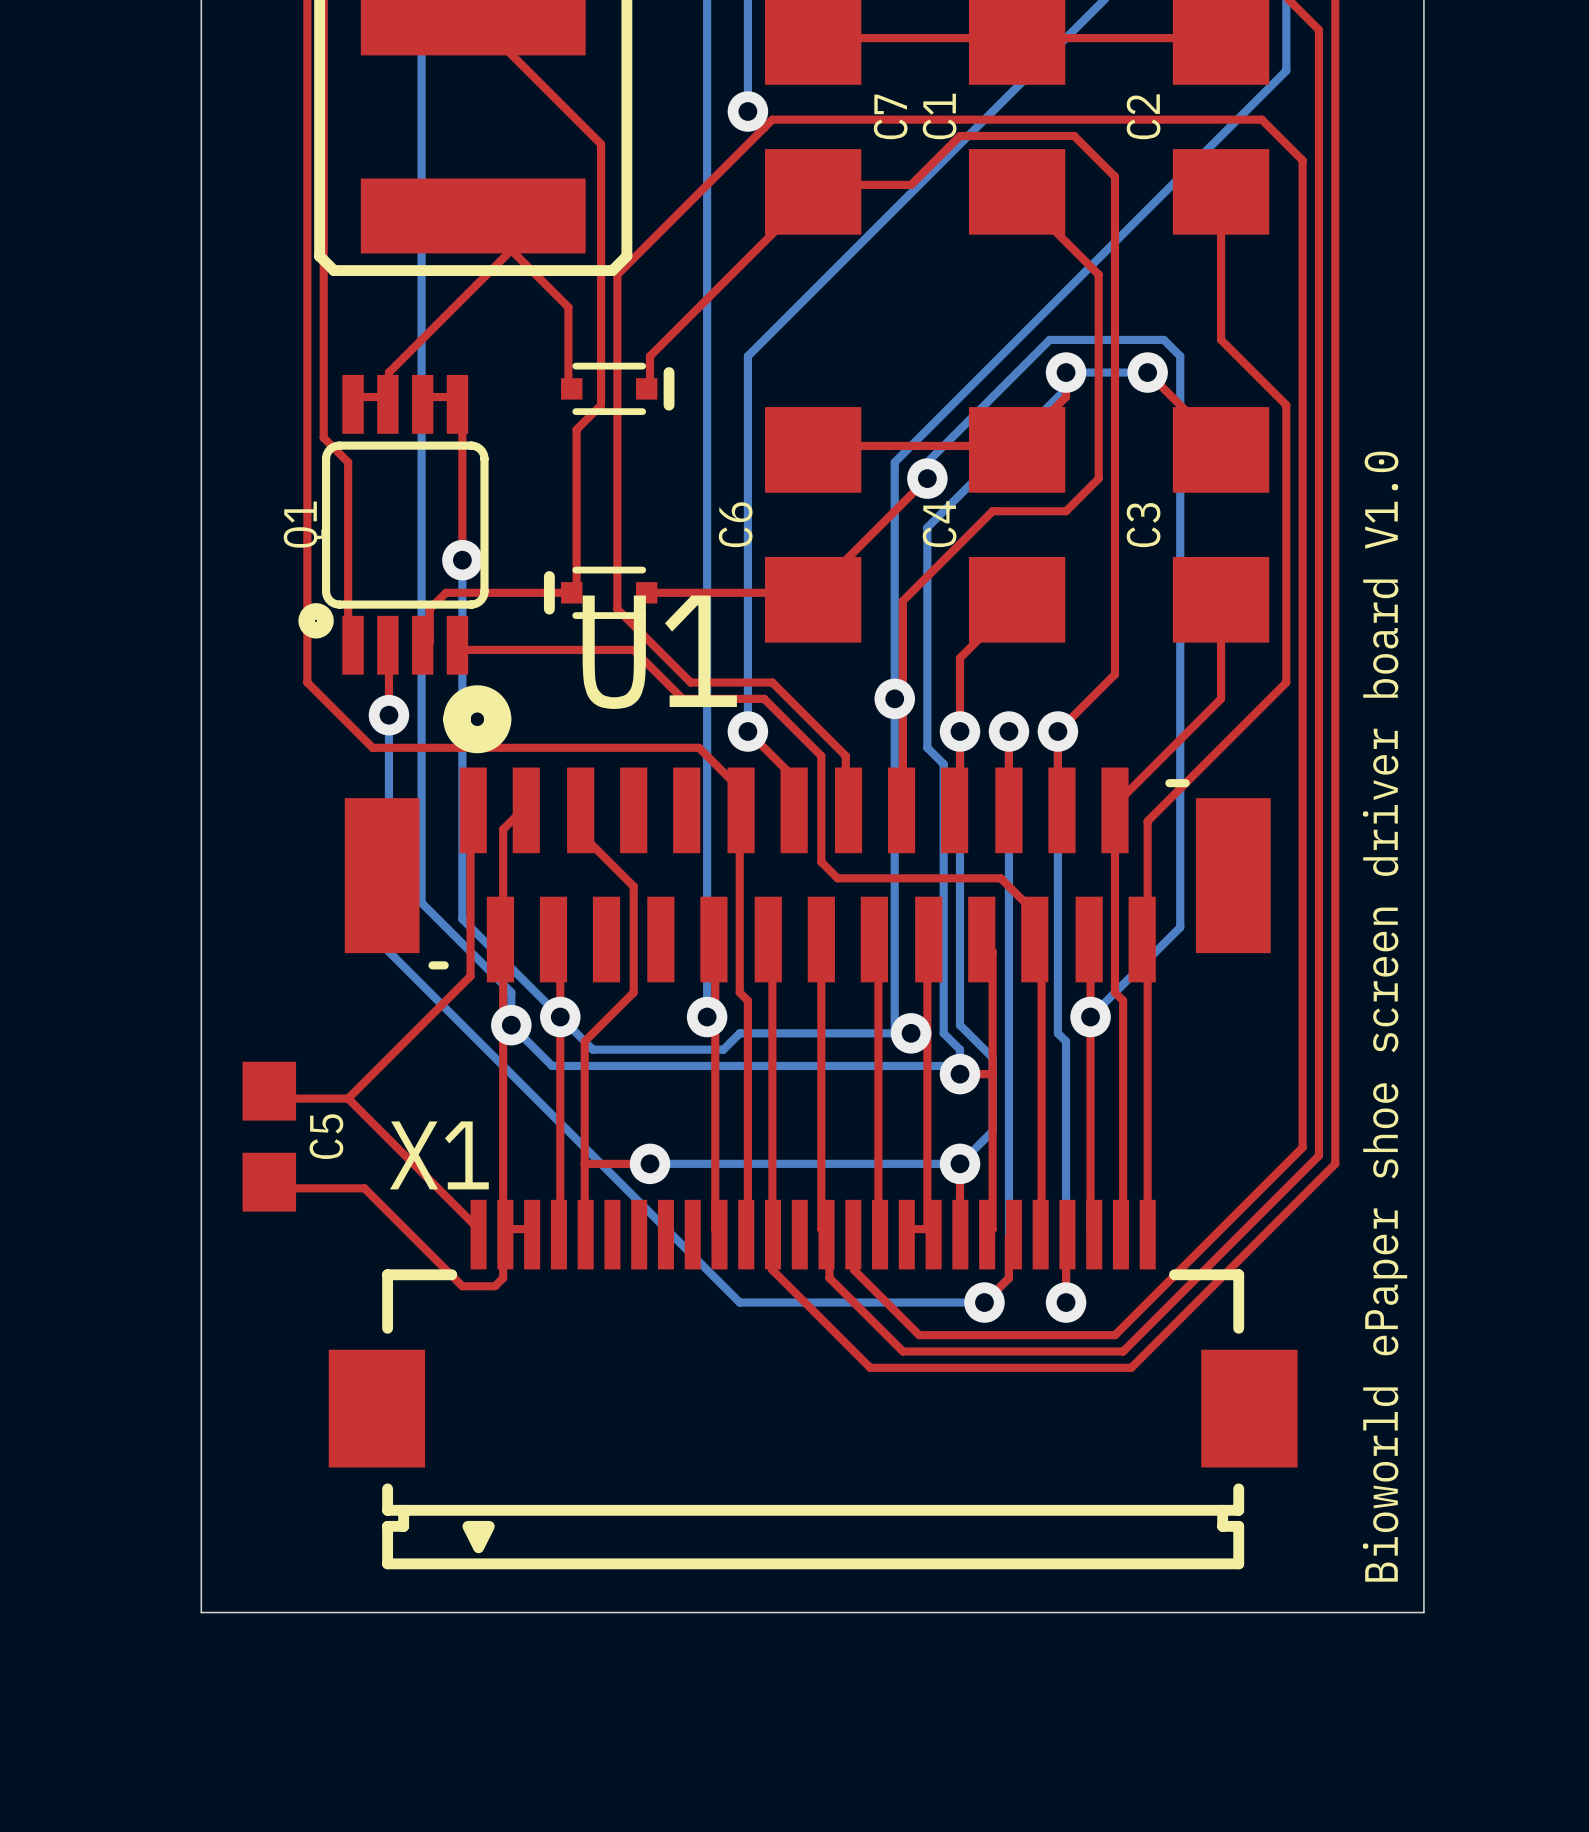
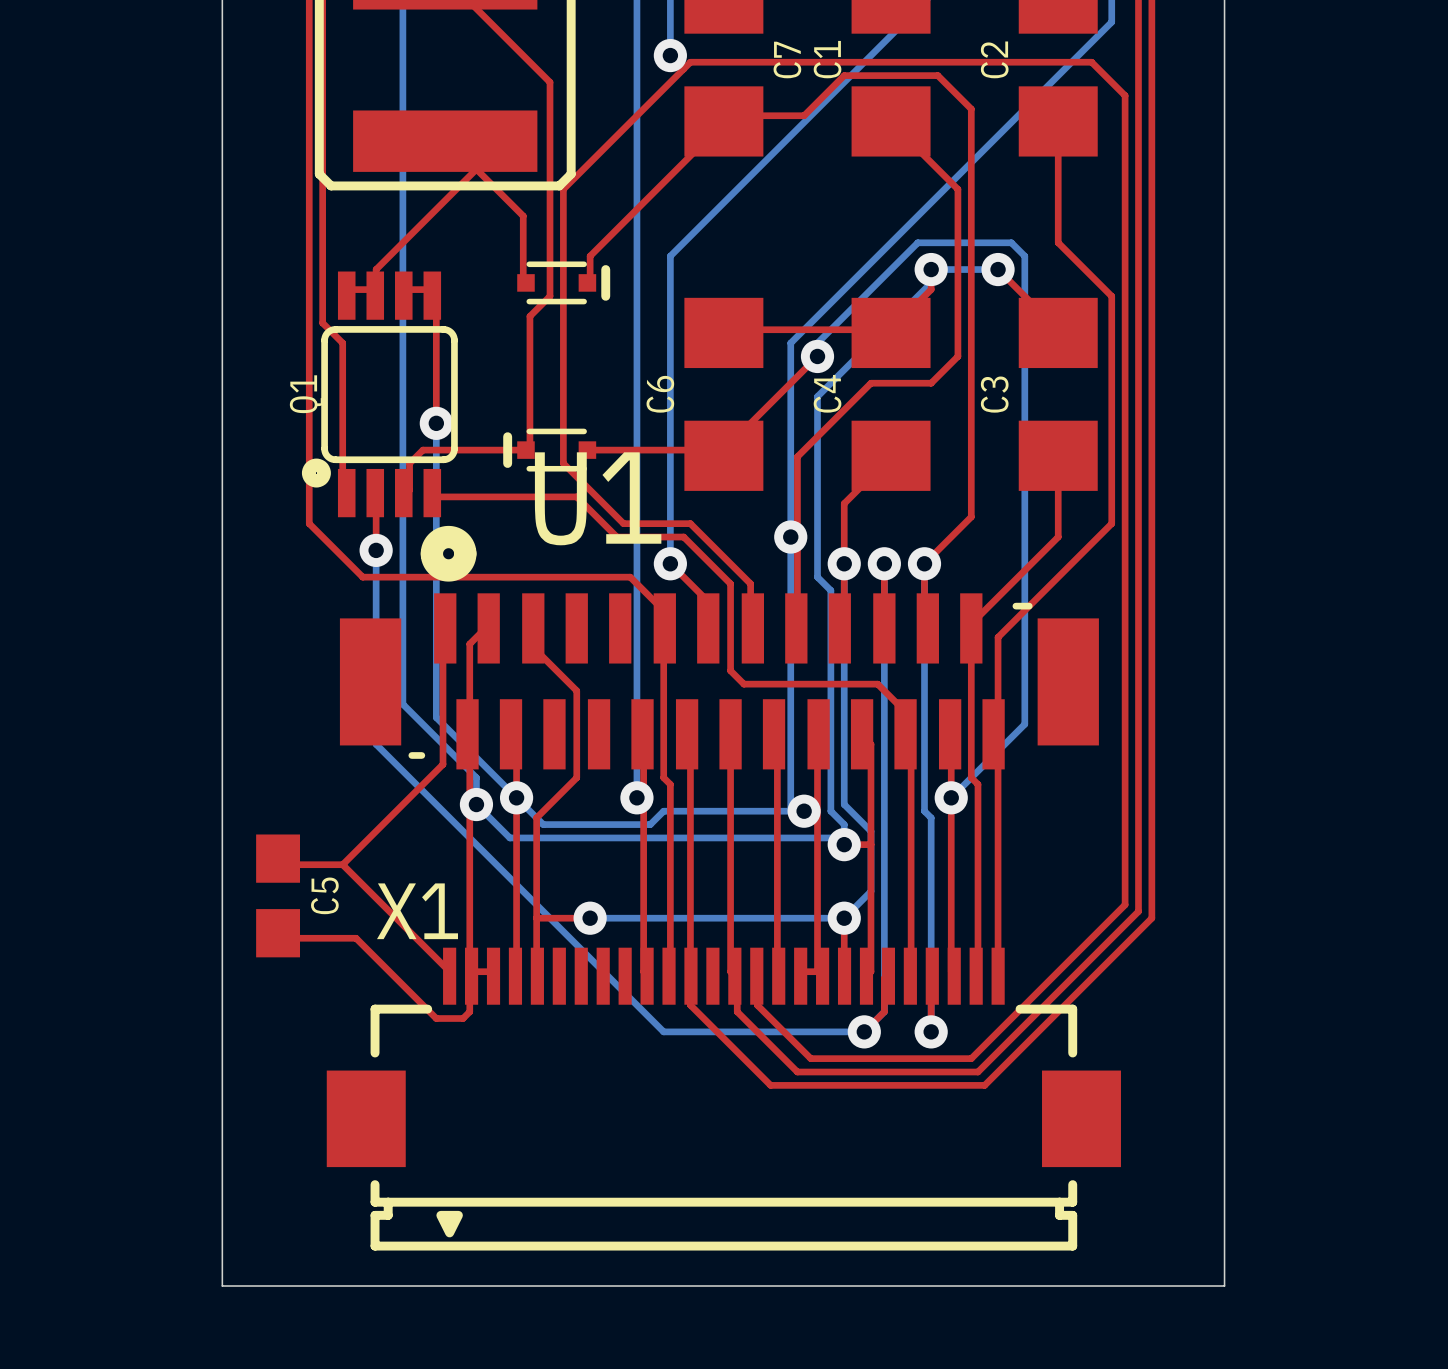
text: Bioworld ePaper shoe screen driver board V1.0 (1385, 1016) -> none

